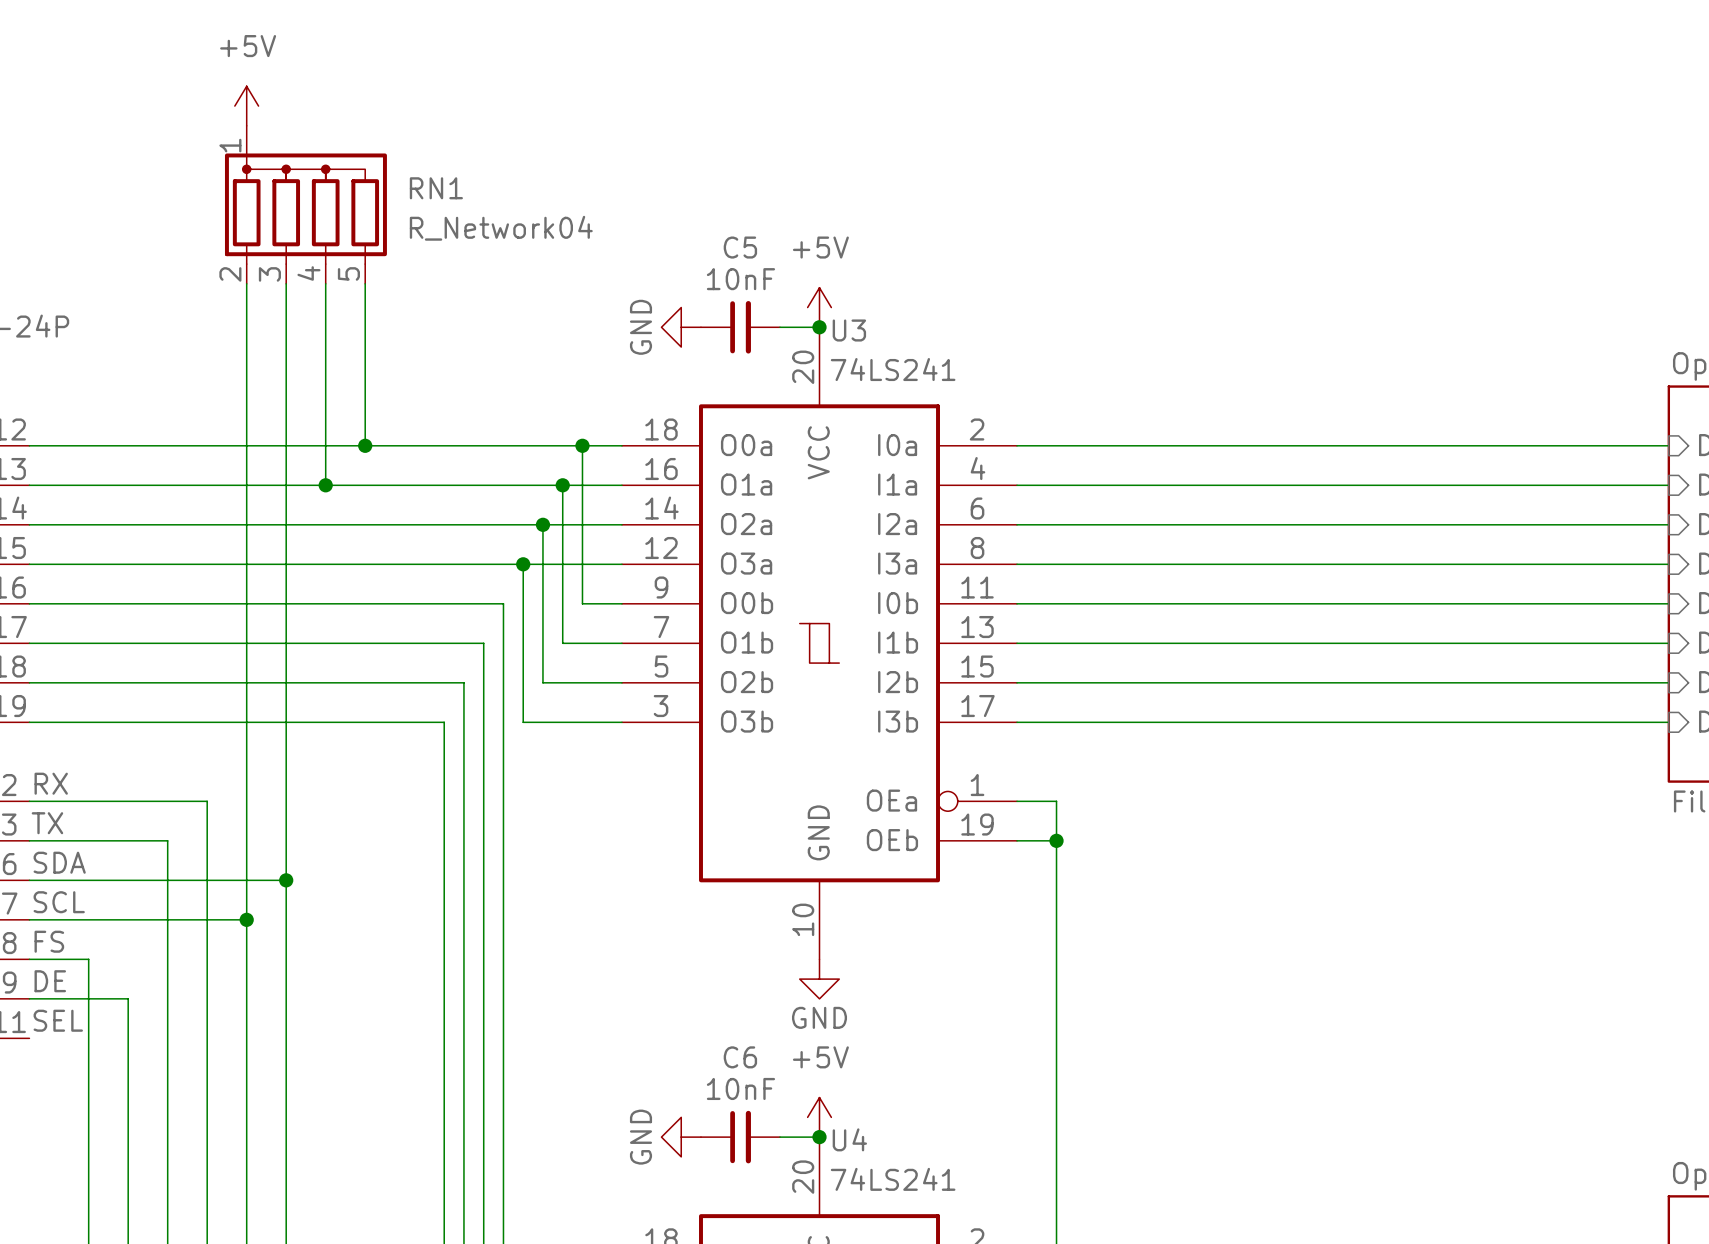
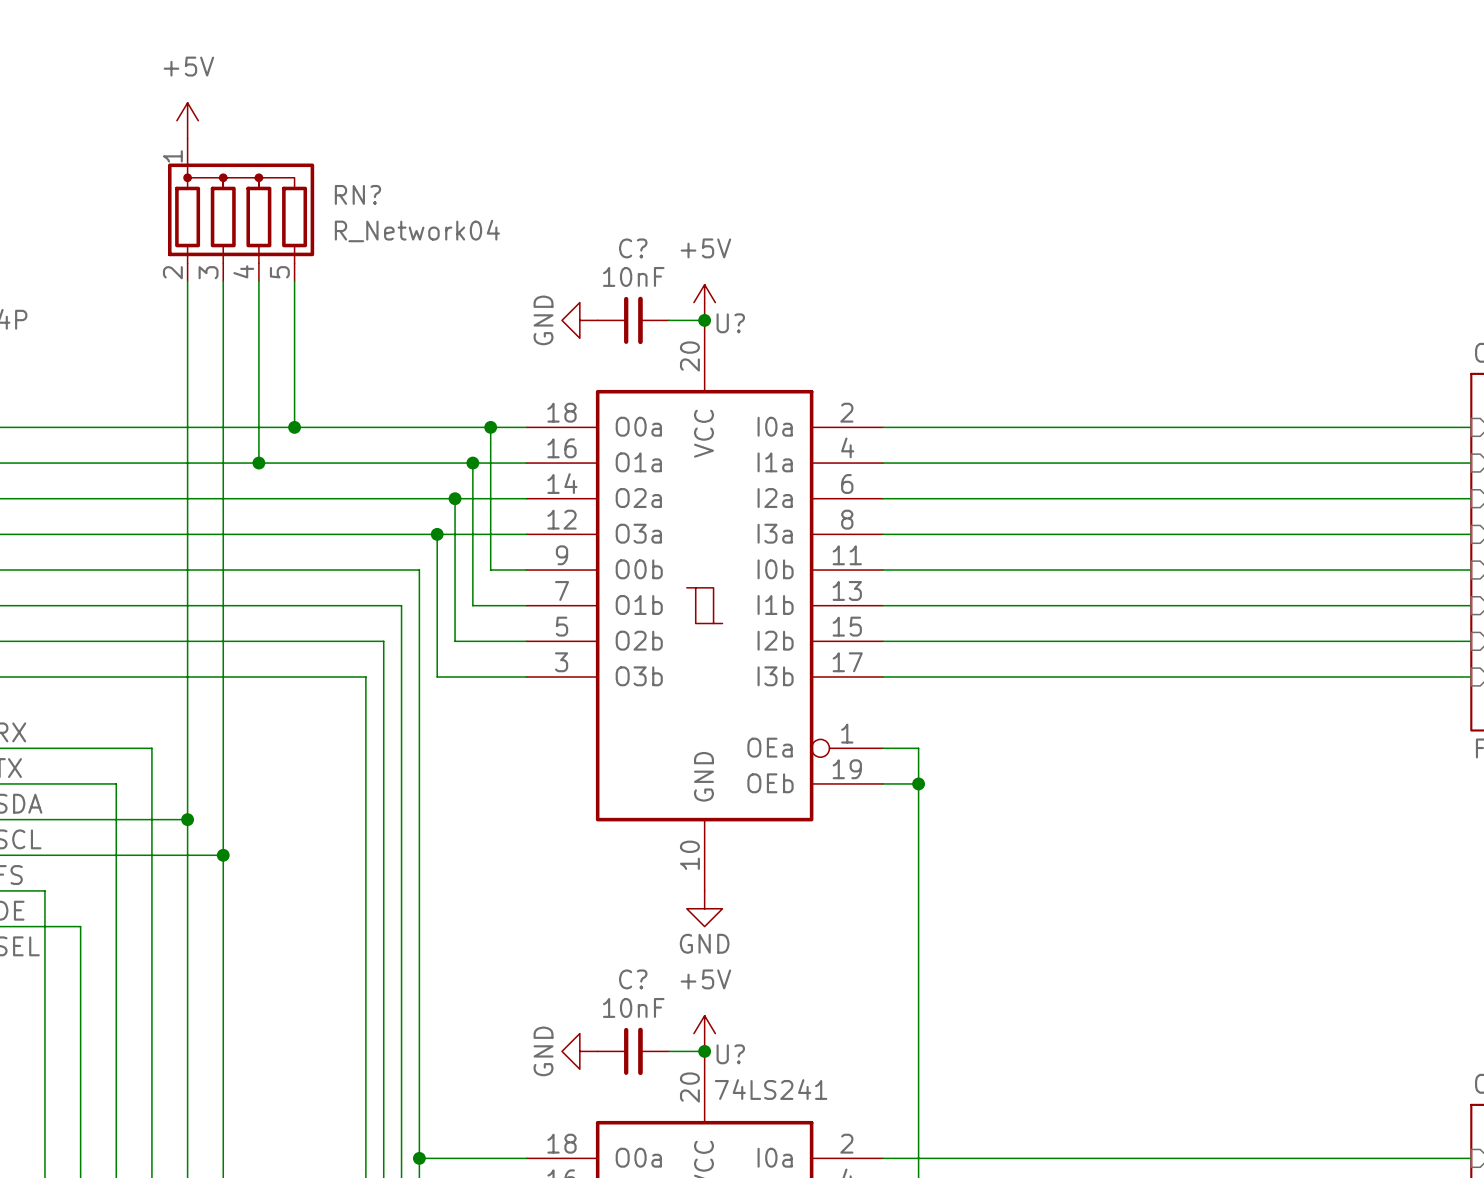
RN1 name: RN1 (436, 188) -> RN? (357, 194)
C5 name: C5 (740, 247) -> C? (633, 248)
U3 name: U3 (849, 330) -> U? (730, 323)
U3 value: 74LS241 (893, 369) -> none
wire: (246, 880) (286, 880) -> (187, 855) (223, 855)
junction: none -> (187, 819)
junction: (286, 880) -> none
junction: (246, 919) -> none
junction: none -> (223, 855)
C6 name: C6 (740, 1057) -> C? (633, 979)
U4 name: U4 (849, 1139) -> U? (730, 1054)

